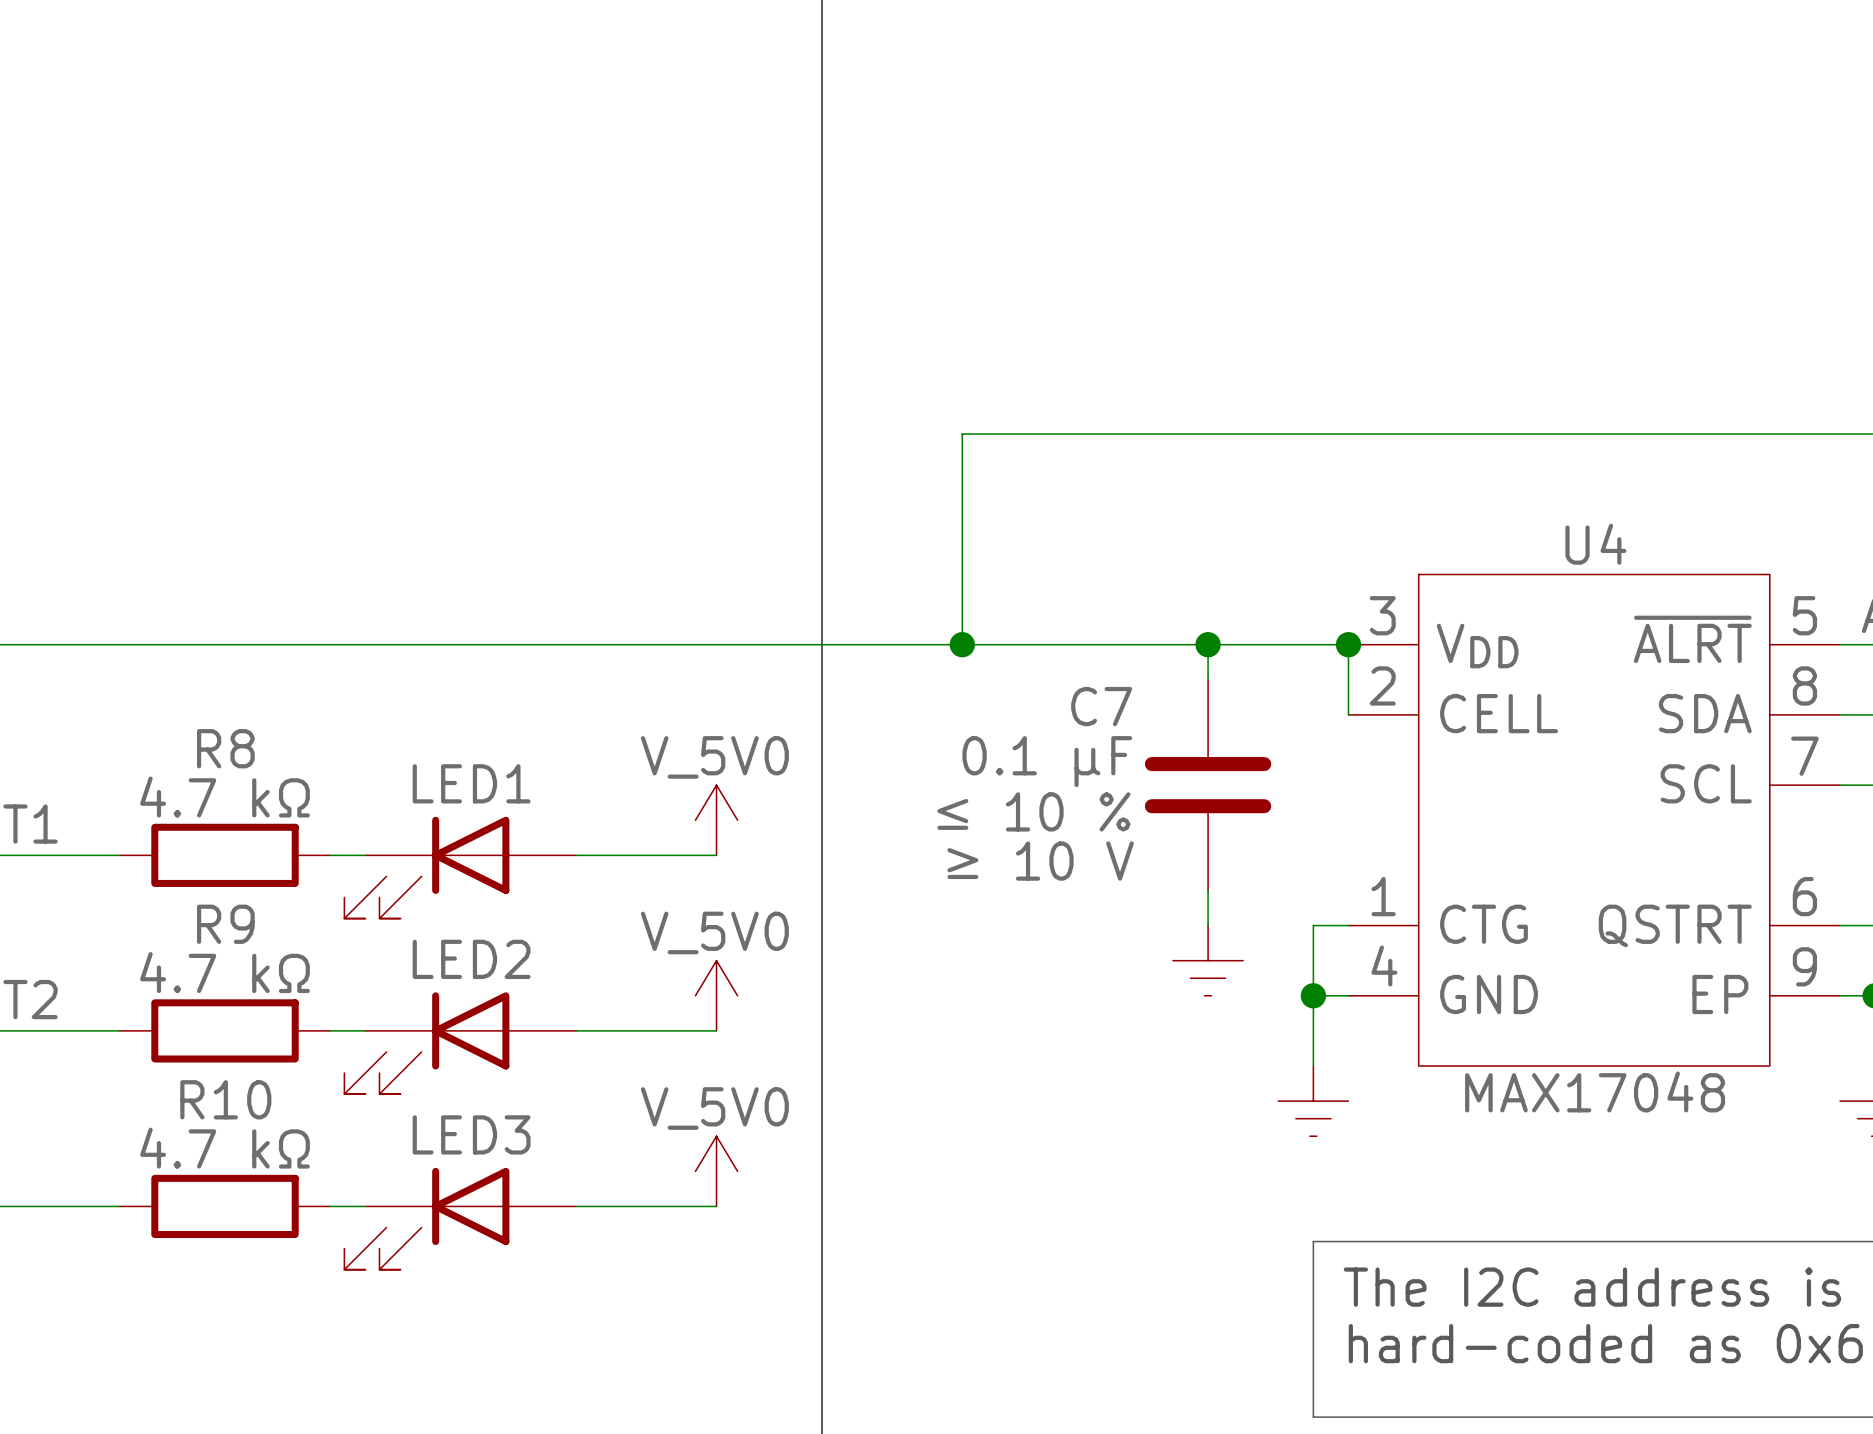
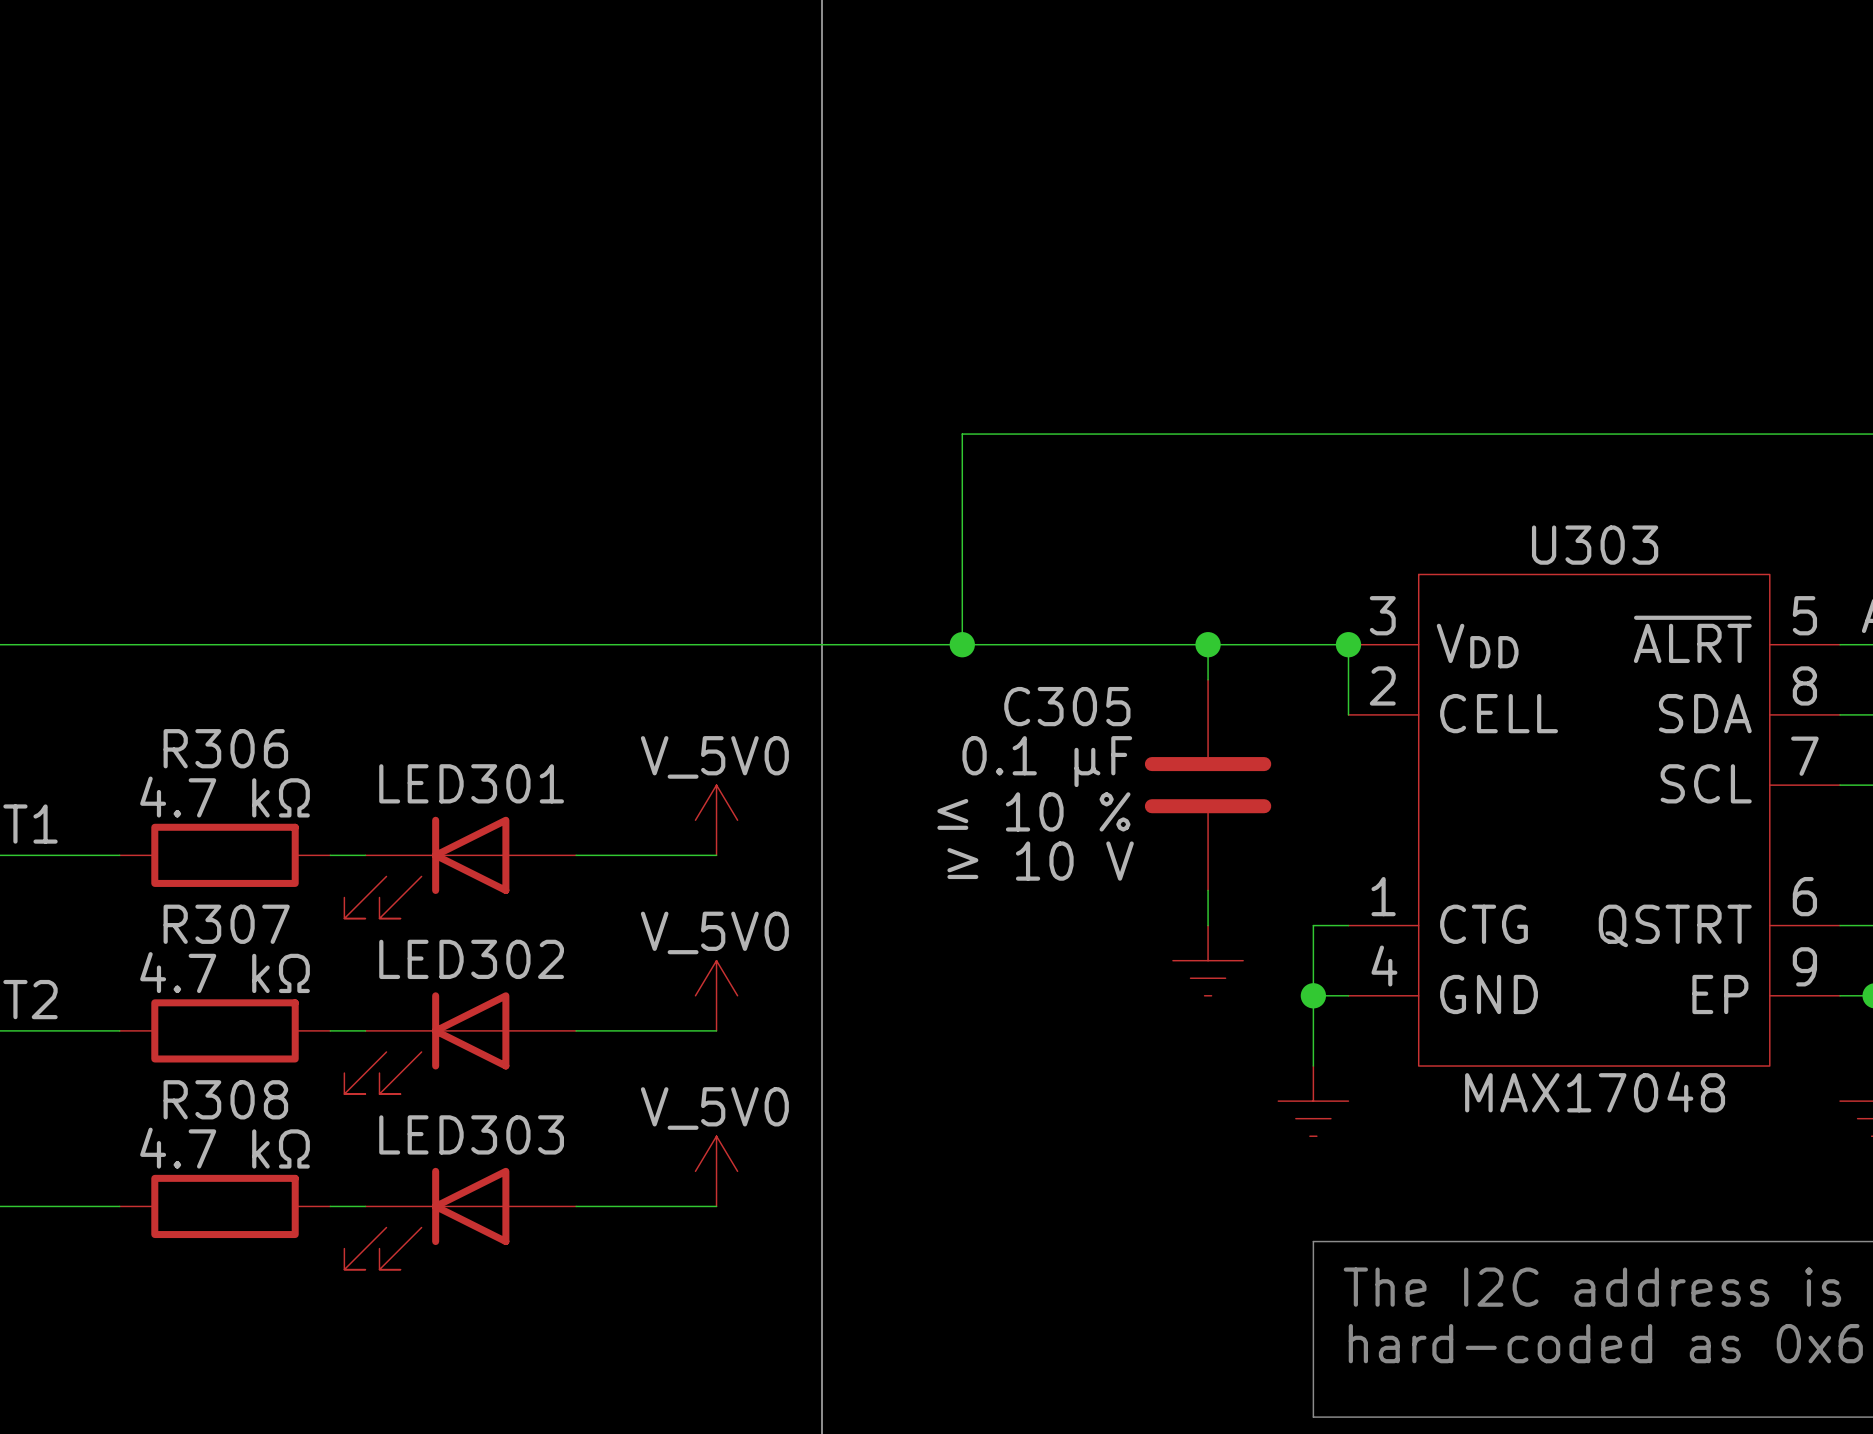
U4 name: U4 (1595, 544) -> U303 (1595, 545)
C7 name: C7 (1101, 706) -> C305 (1067, 706)
R8 name: R8 (225, 748) -> R306 (225, 748)
LED1 name: LED1 (471, 783) -> LED301 (471, 783)
R9 name: R9 (225, 924) -> R307 (226, 924)
LED2 name: LED2 (471, 959) -> LED302 (471, 959)
R10 name: R10 (225, 1099) -> R308 (225, 1099)
LED3 name: LED3 (471, 1134) -> LED303 (471, 1134)

